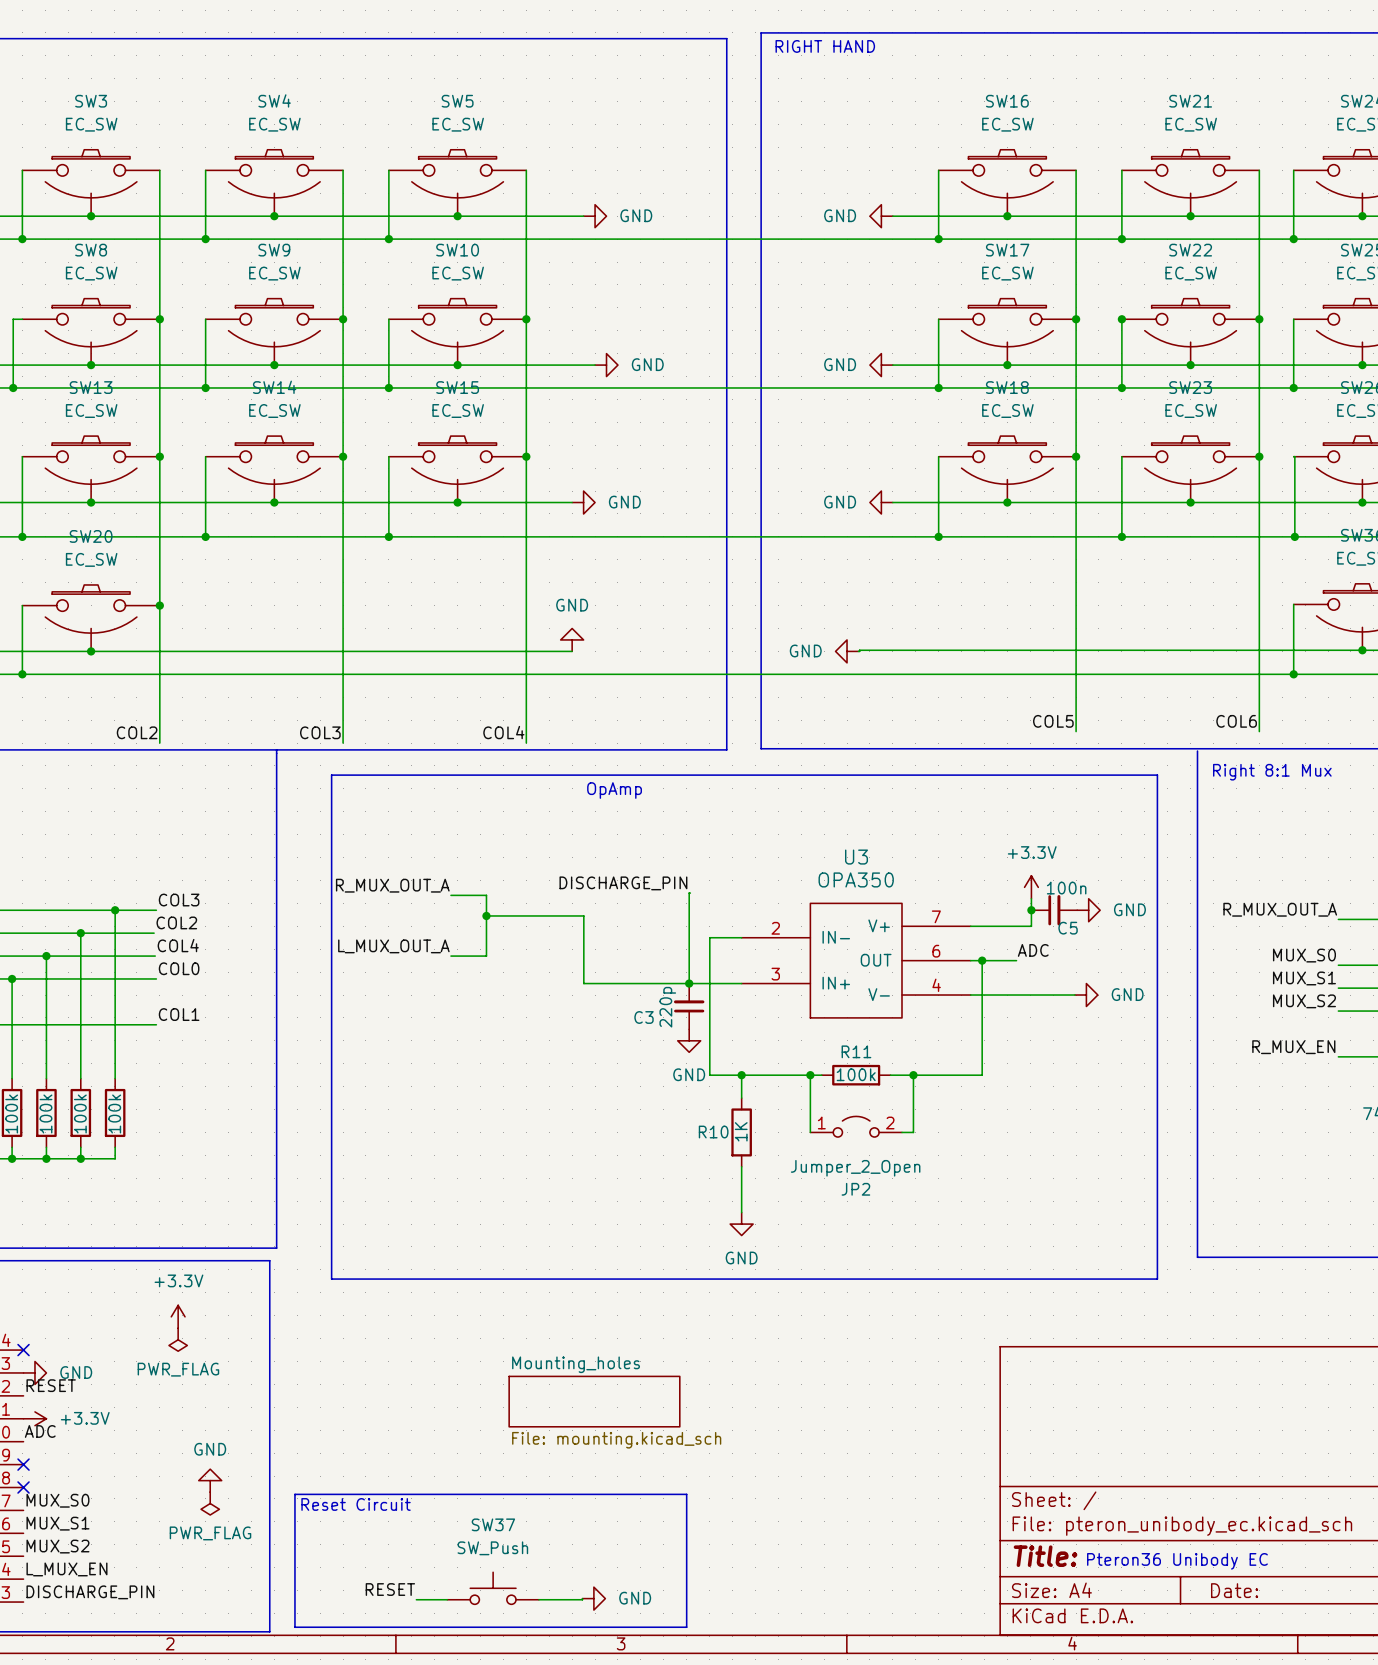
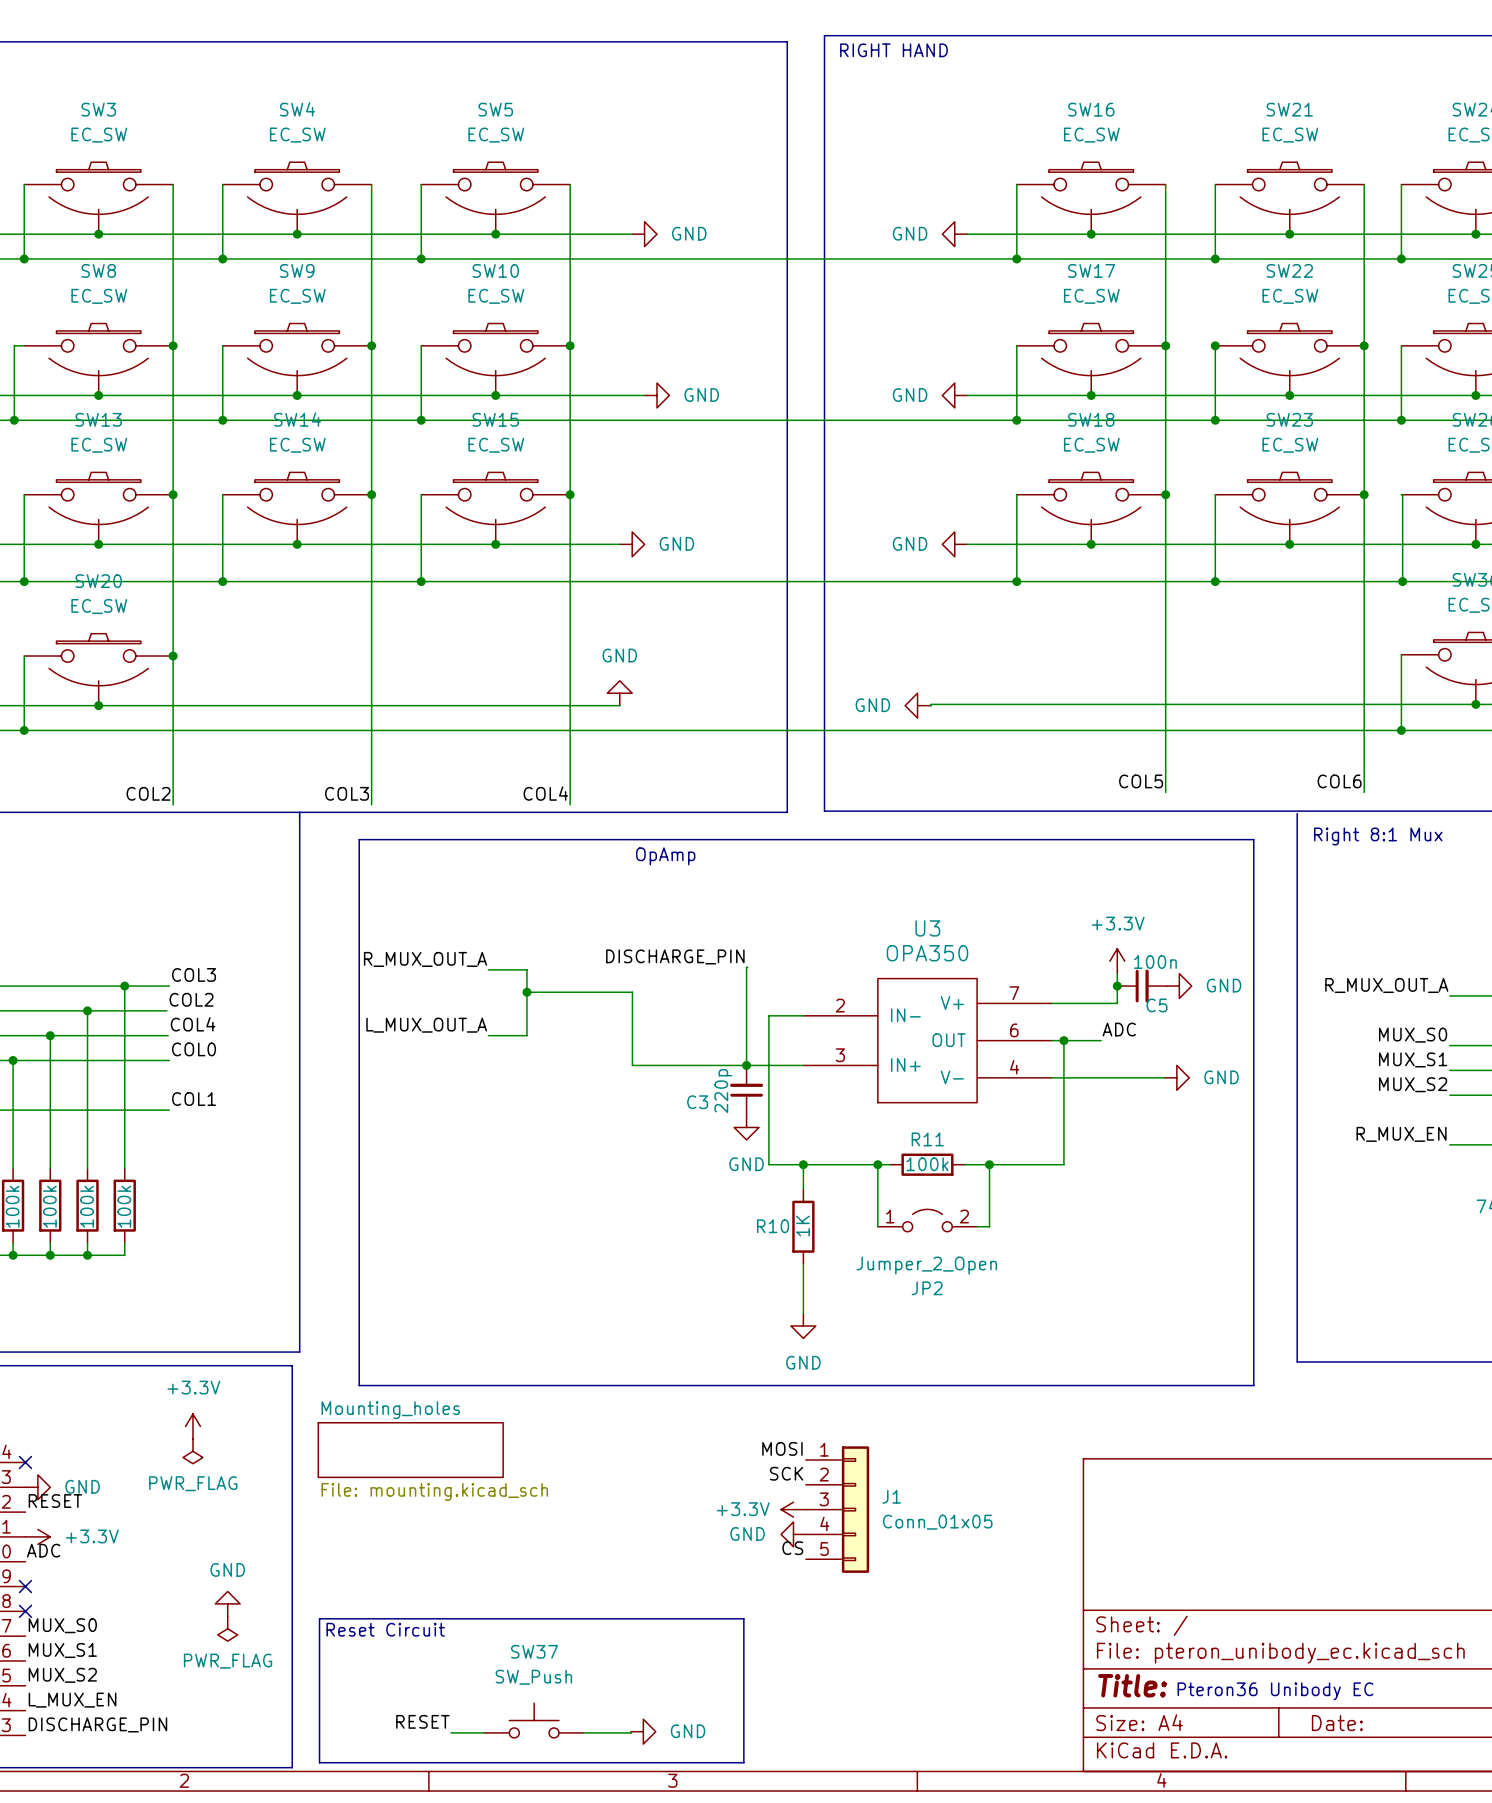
label: none -> MOSI (782, 1448)
label: none -> SCK (786, 1473)
power symbol: none -> +3.3V (793, 1509)
J1: none -> Conn_01x05 (837, 1509)
sheet Mounting_holes position: (594, 1401) -> (410, 1450)
power symbol: none -> GND (793, 1534)
label: none -> CS (792, 1548)

